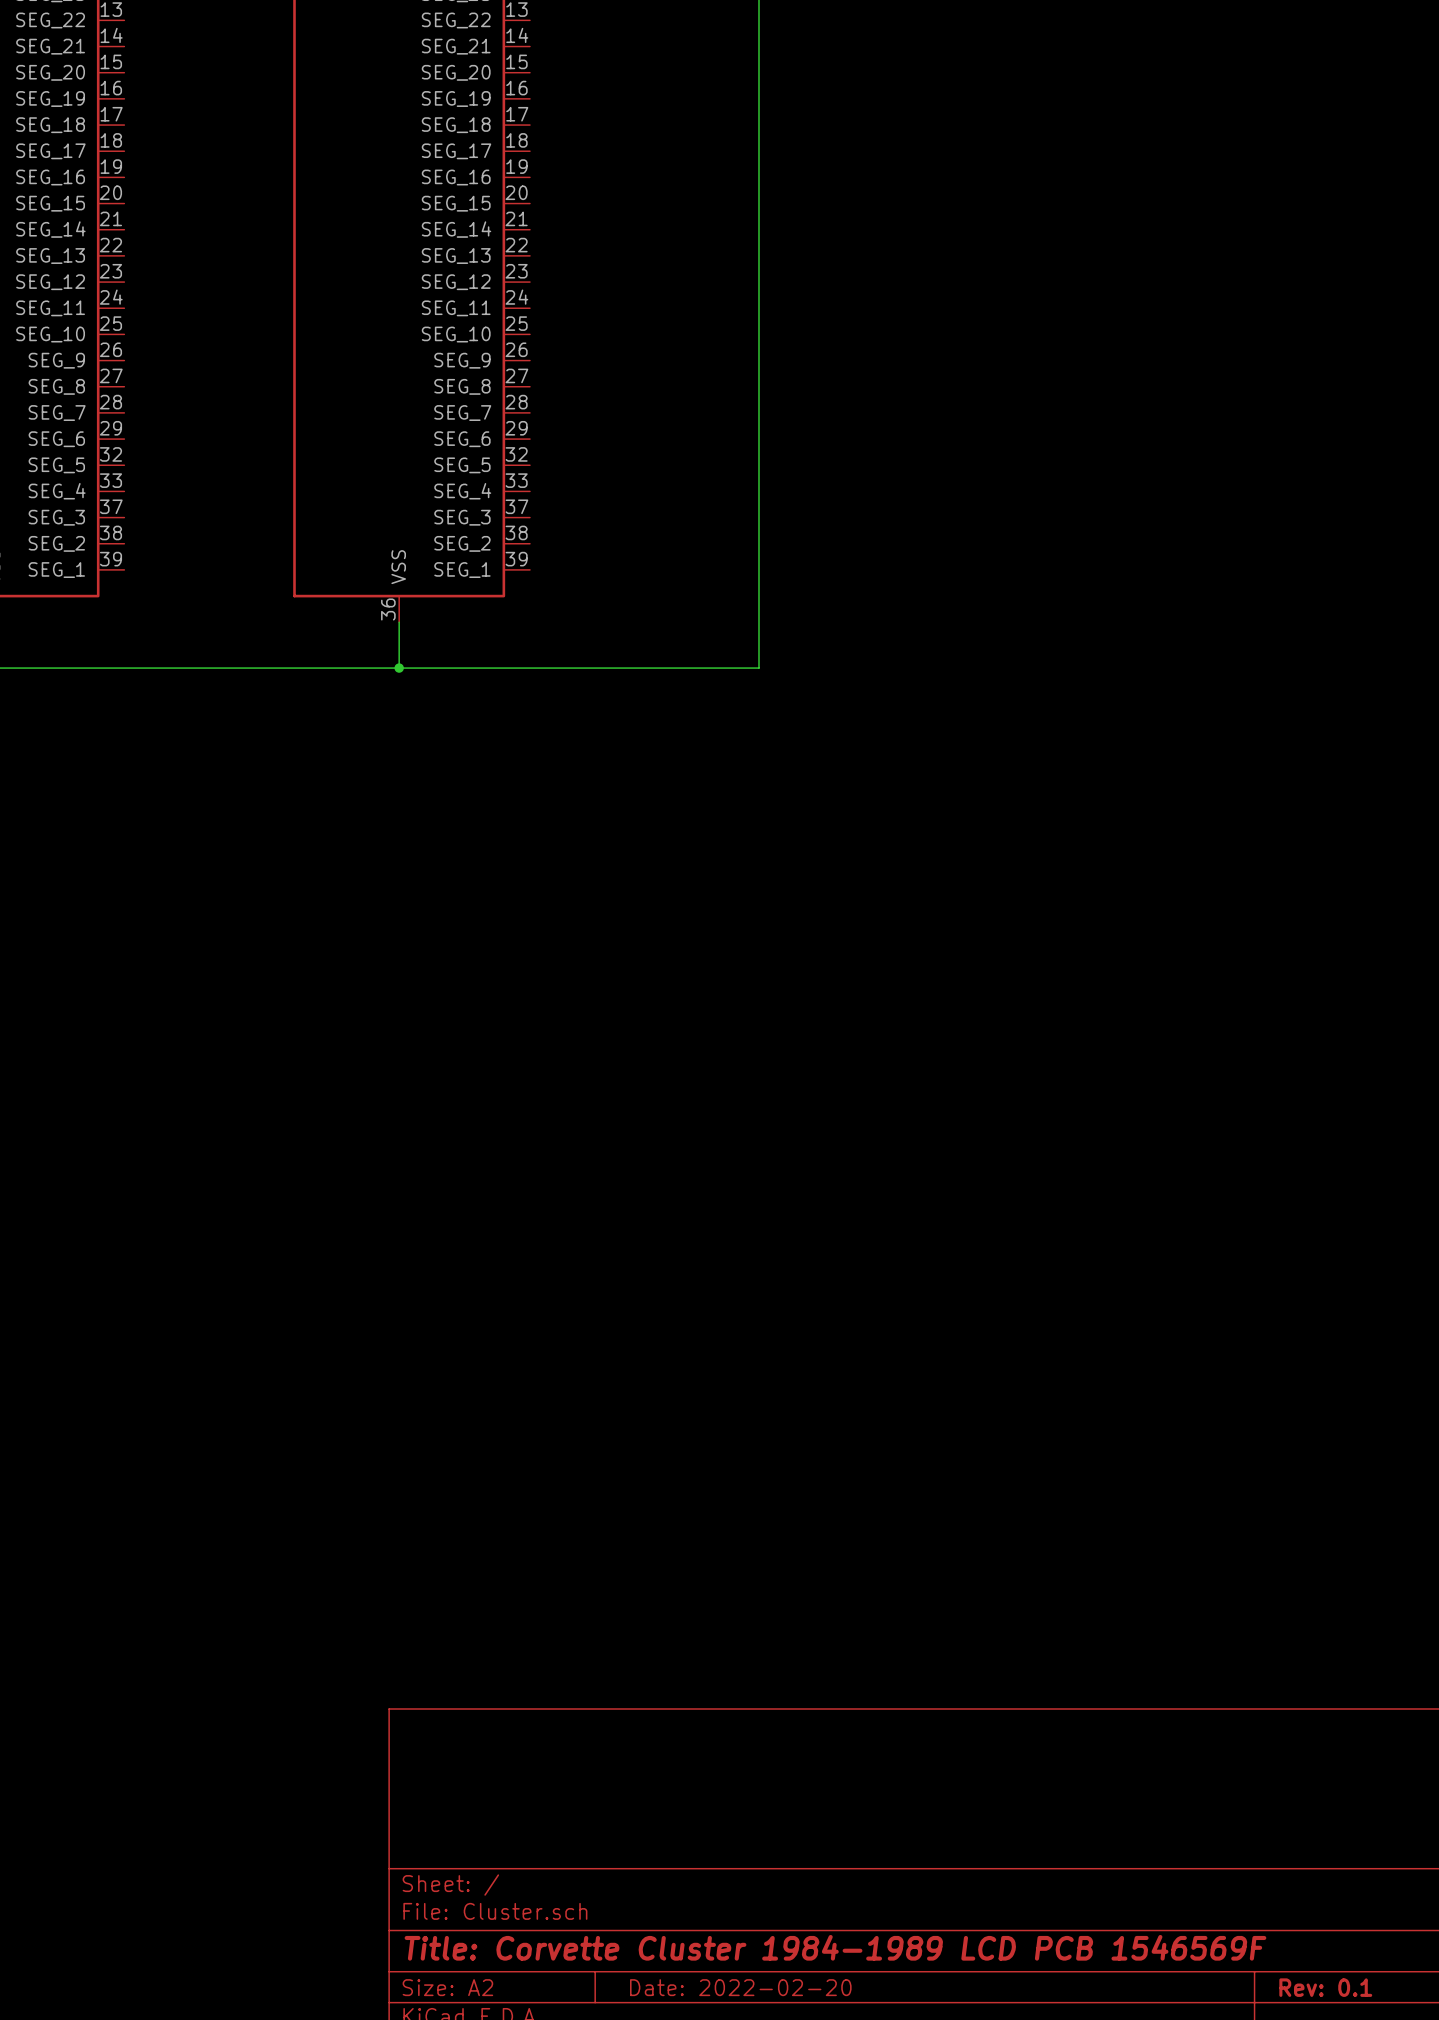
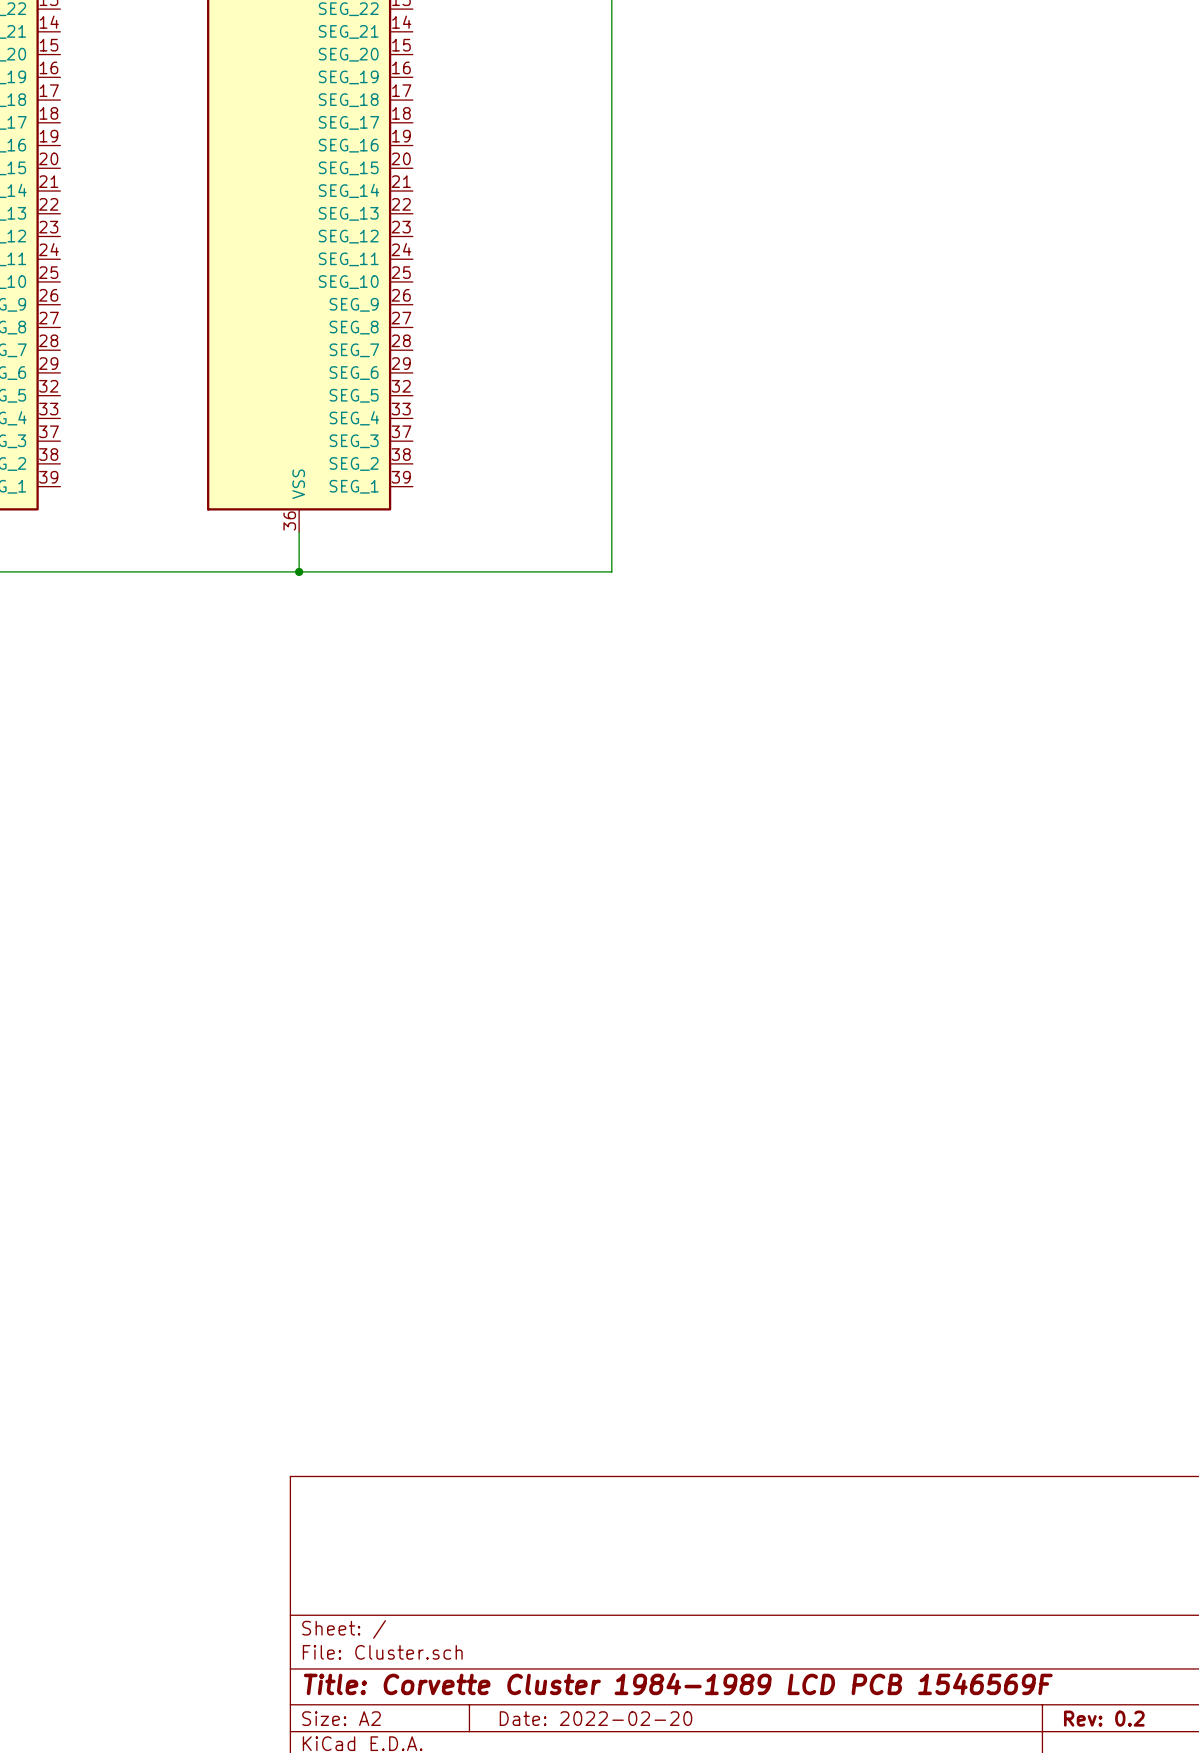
title block: Rev: 0.1 (1325, 1987) -> Rev: 0.2 (1104, 1718)

